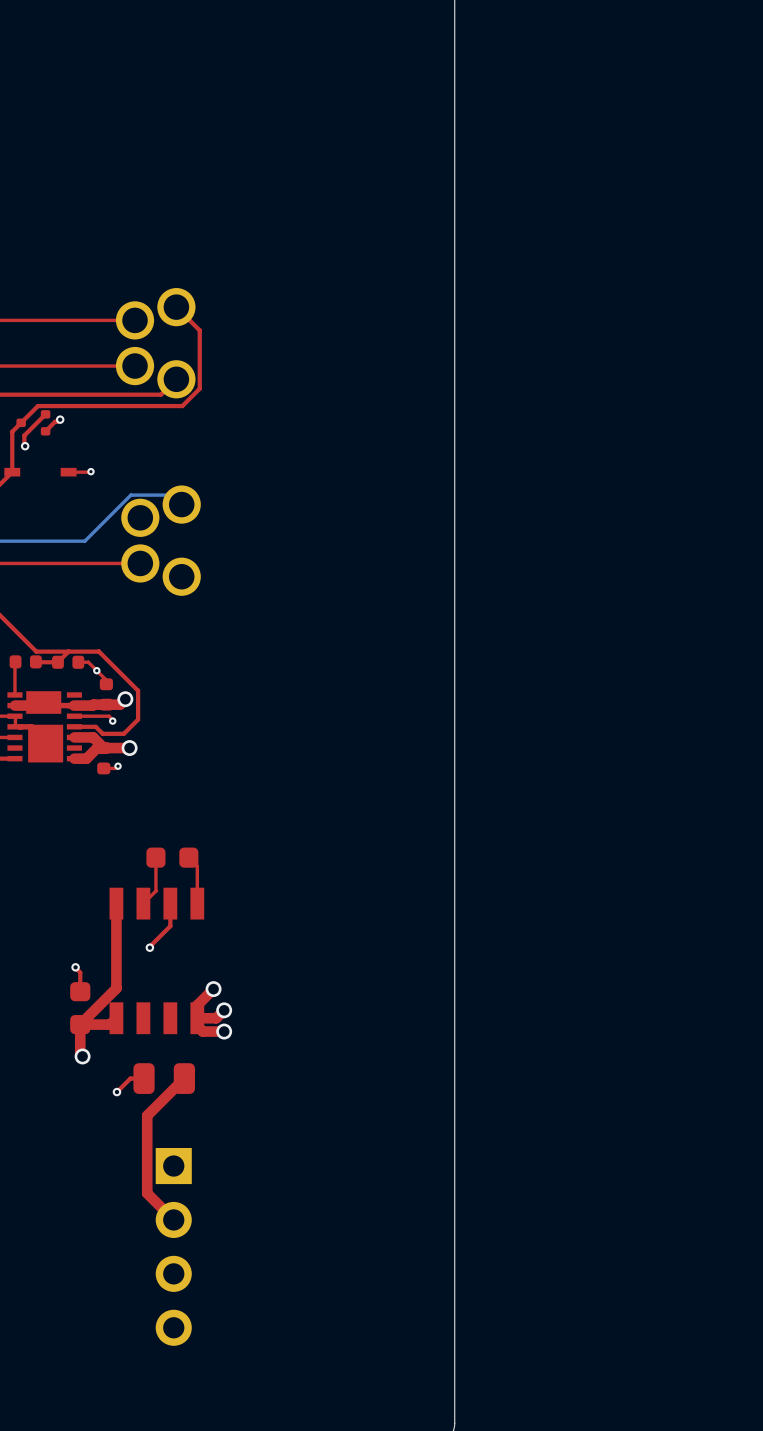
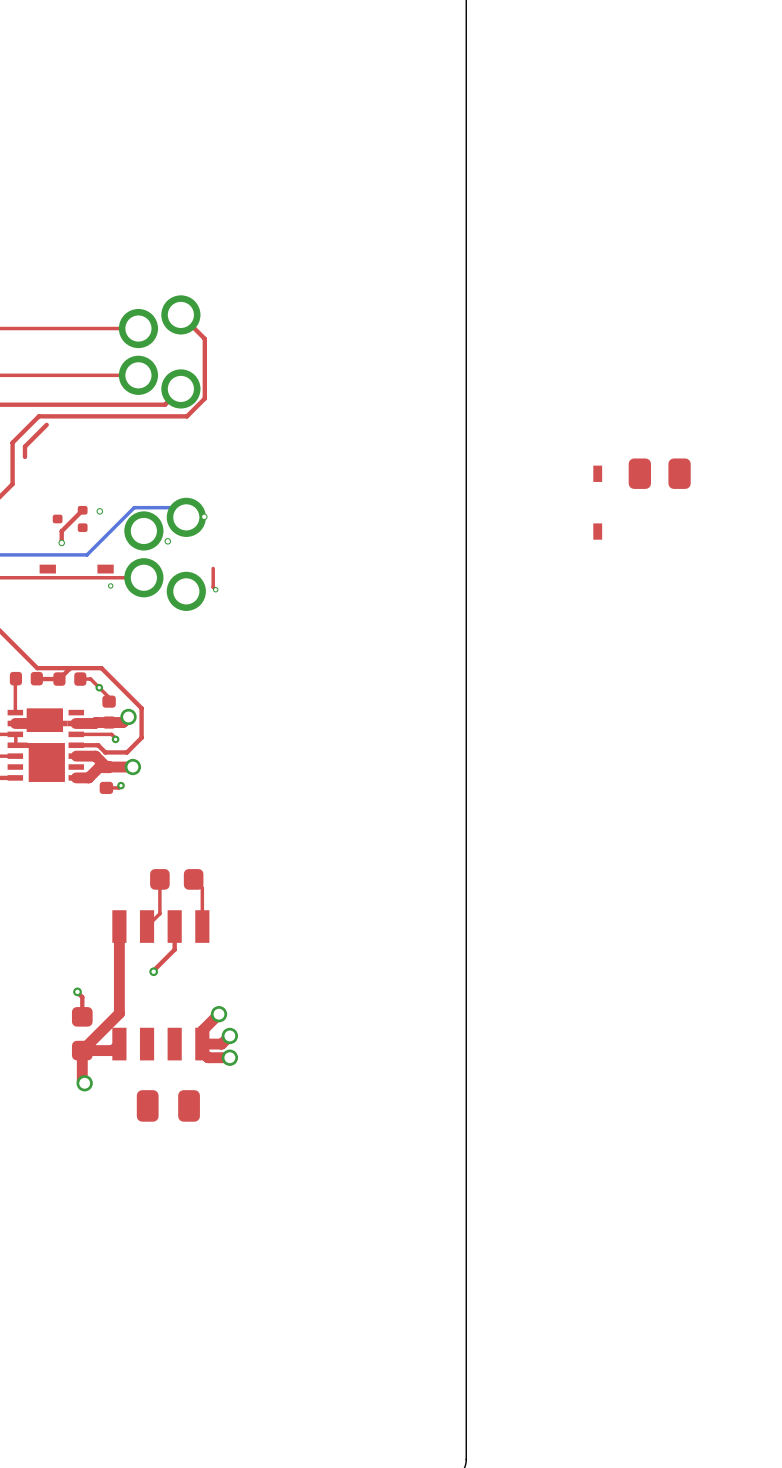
top track: (60, 419) (45, 431) -> none
via: (60, 419) -> none
part: (33, 422) -> none
via: (25, 446) -> none
part: none -> (659, 473)
top track: (90, 471) (68, 472) -> none
via: (90, 471) -> none
part: (40, 472) -> none
part: none -> (597, 502)
top track: none -> (82, 510) (61, 531) (61, 542)
via: none -> (99, 511)
via: none -> (204, 516)
part: none -> (70, 518)
via: none -> (167, 541)
via: none -> (61, 542)
part: none -> (76, 569)
top track: none -> (213, 568) (213, 587) (215, 589)
via: none -> (110, 585)
via: none -> (215, 589)
part footprint: [7, 691, 83, 763] -> [7, 708, 85, 782]
top track: (144, 1078) (130, 1078) (116, 1092) -> none
top track: (184, 1078) (147, 1115) (147, 1193) (173, 1219) -> none
via: (116, 1092) -> none
part: (173, 1246) -> none

